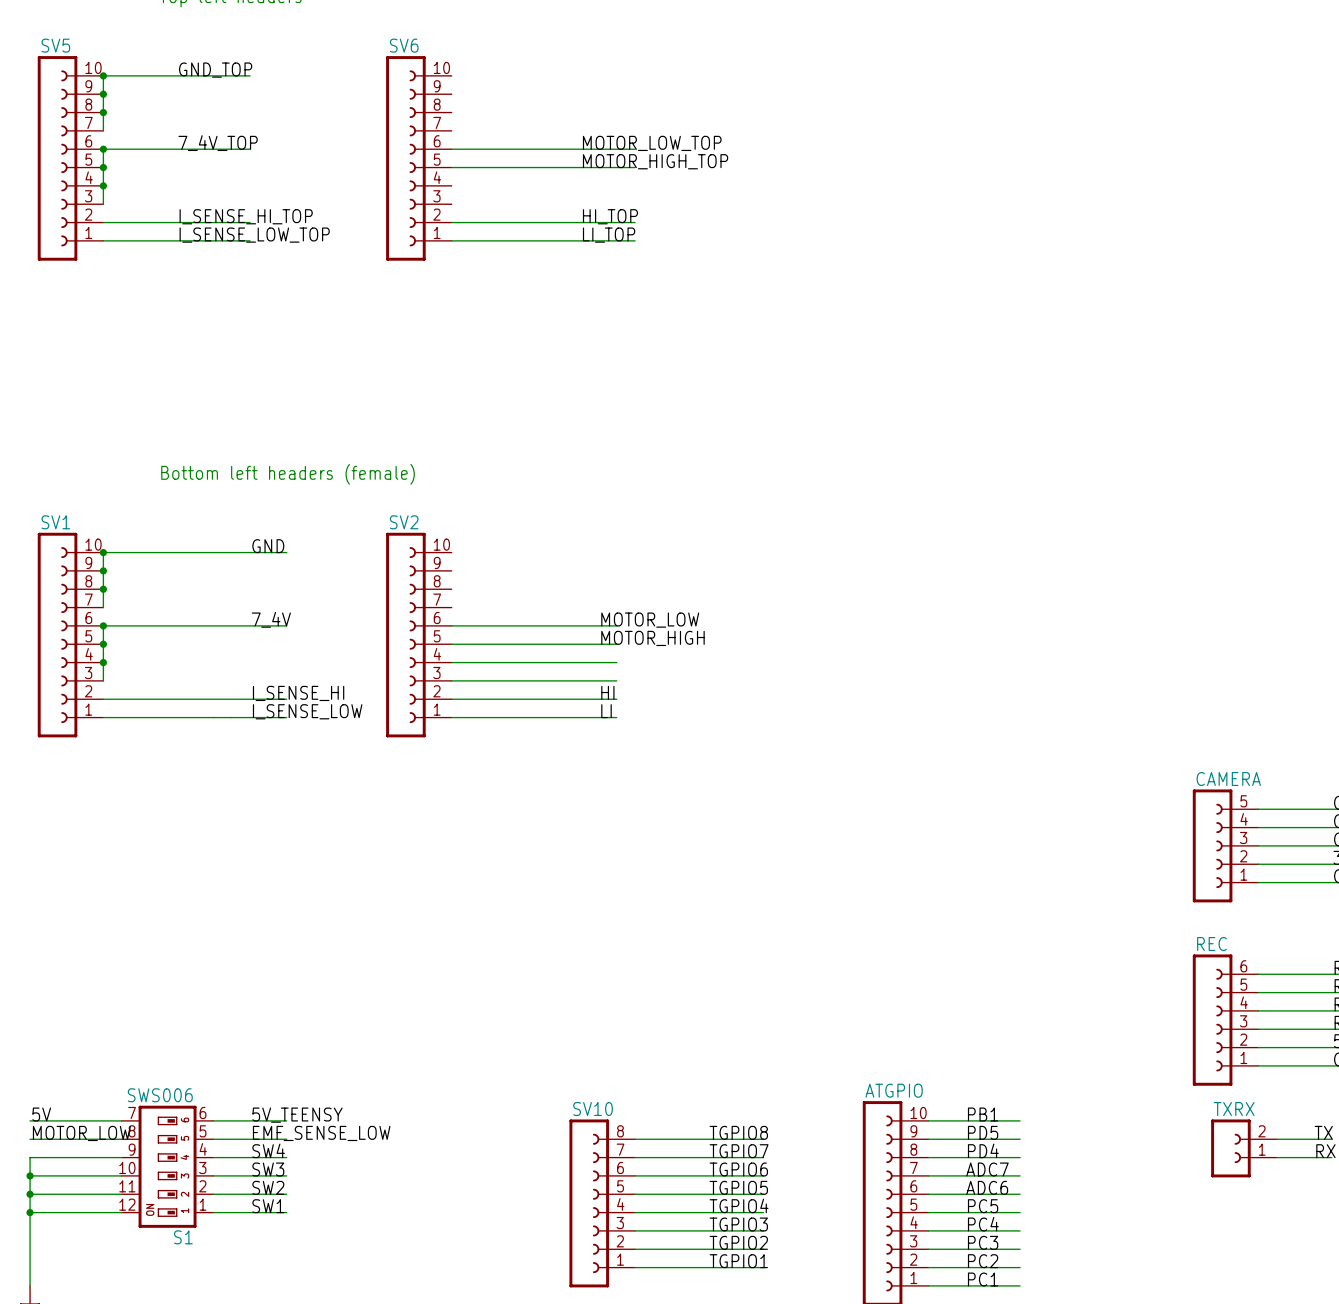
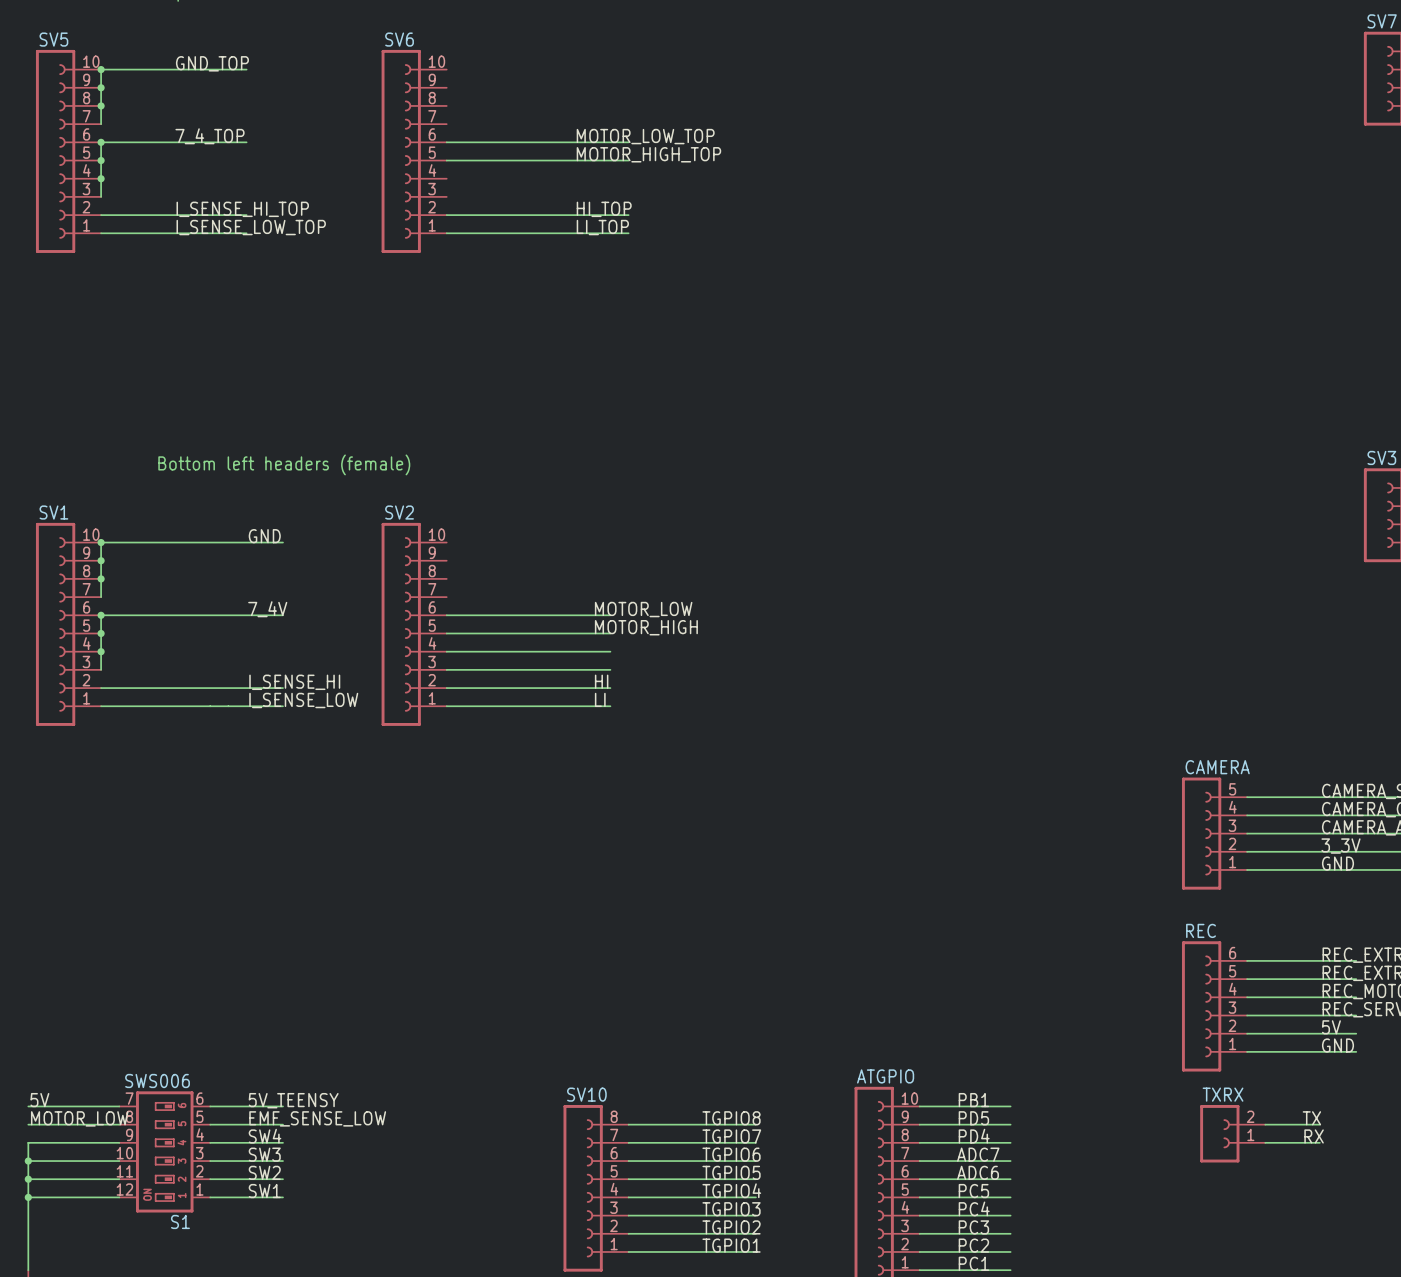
label: 7_4V_TOP (218, 143) -> 7_4_TOP (209, 136)

